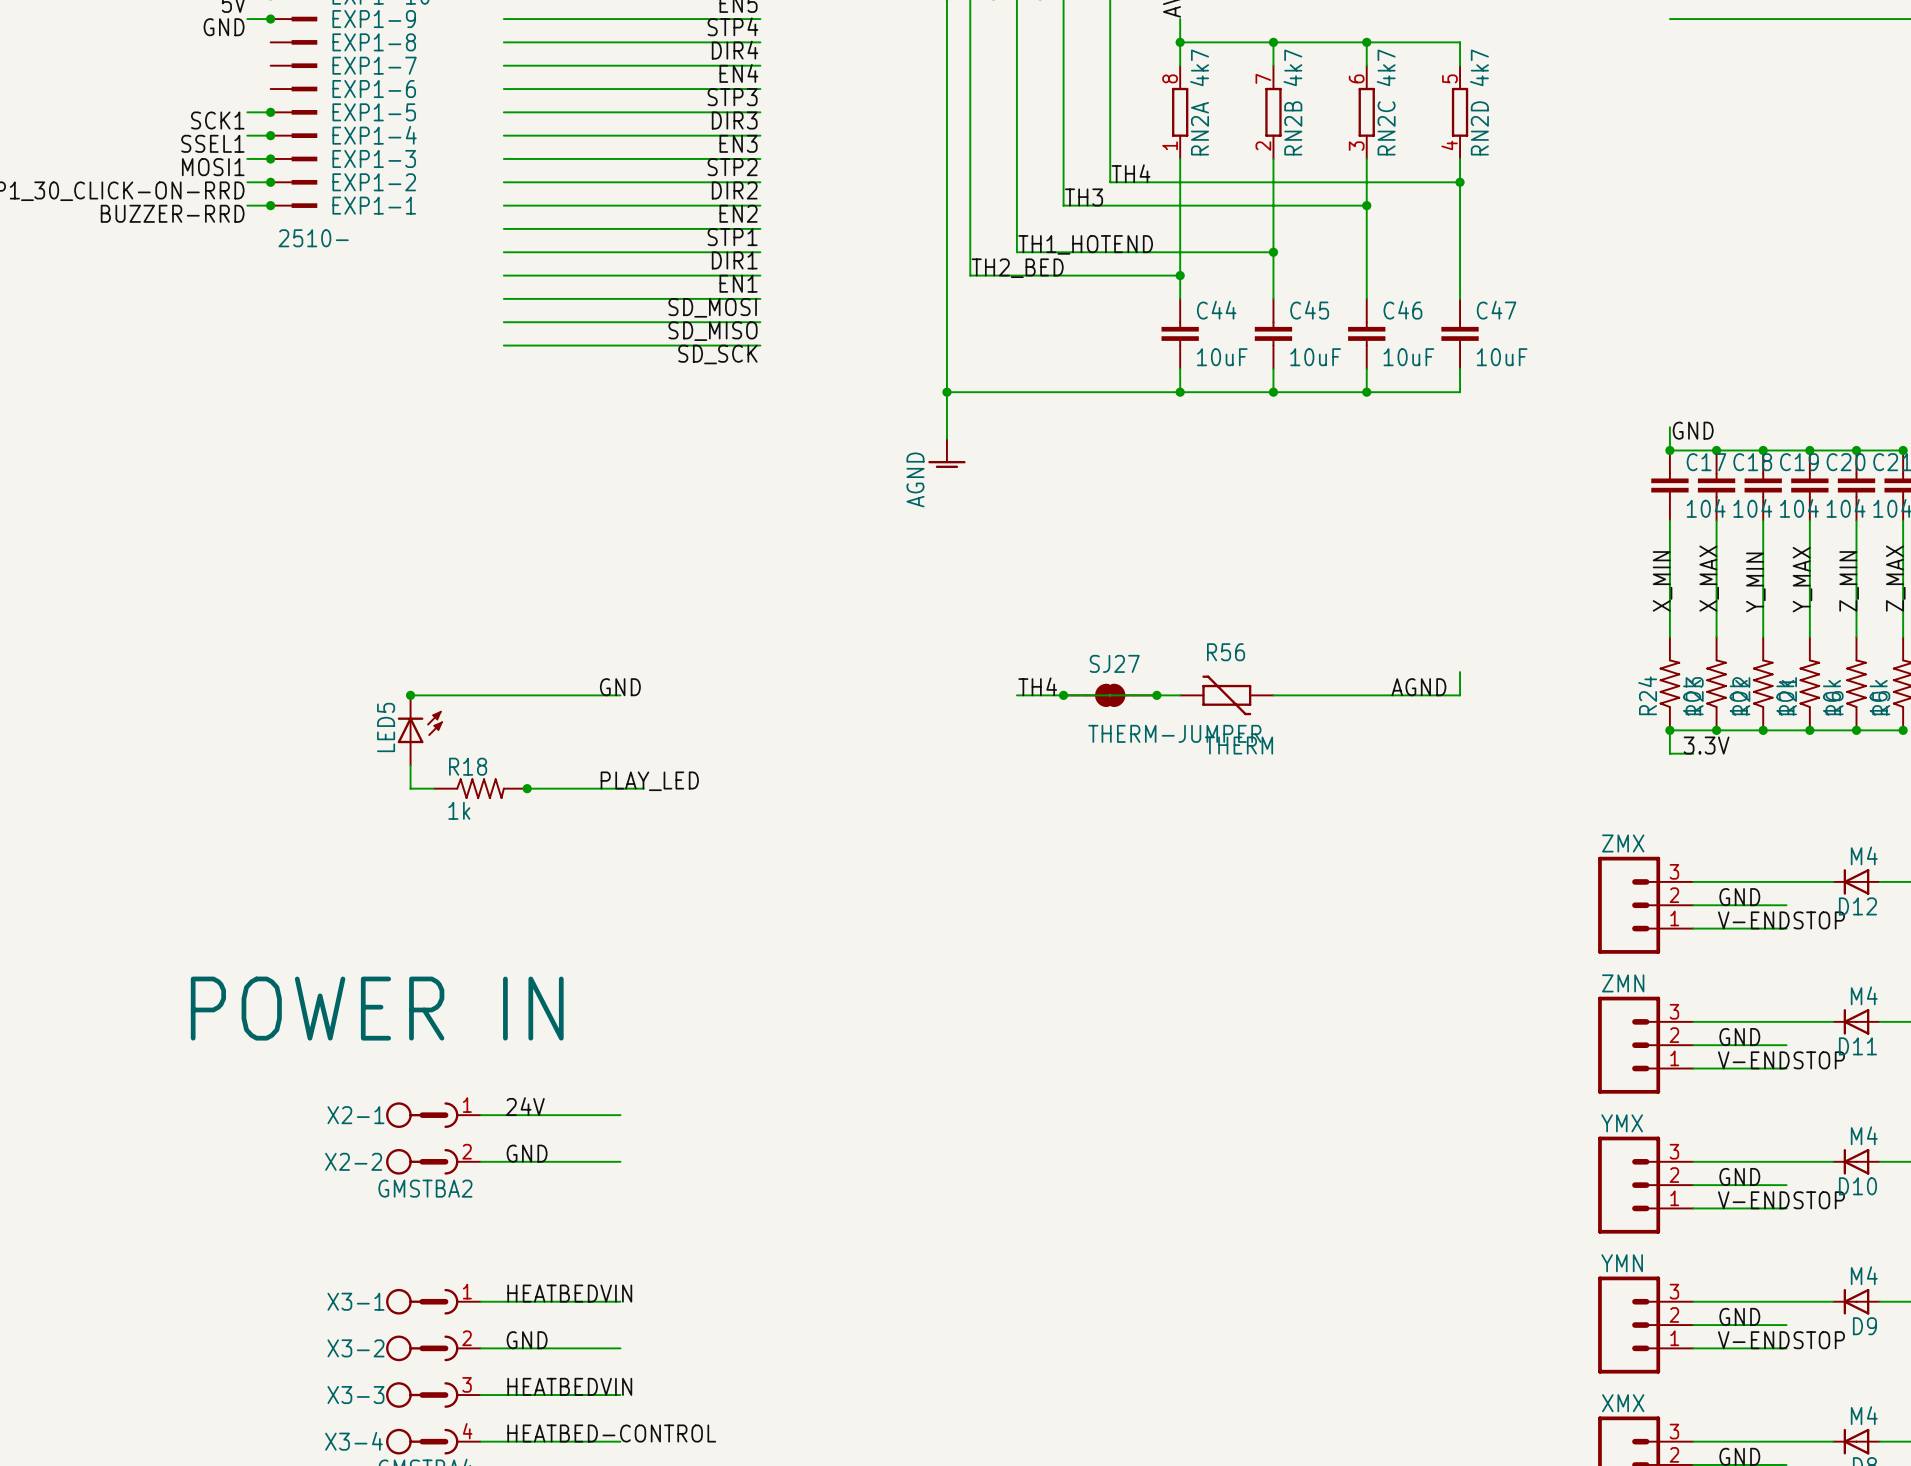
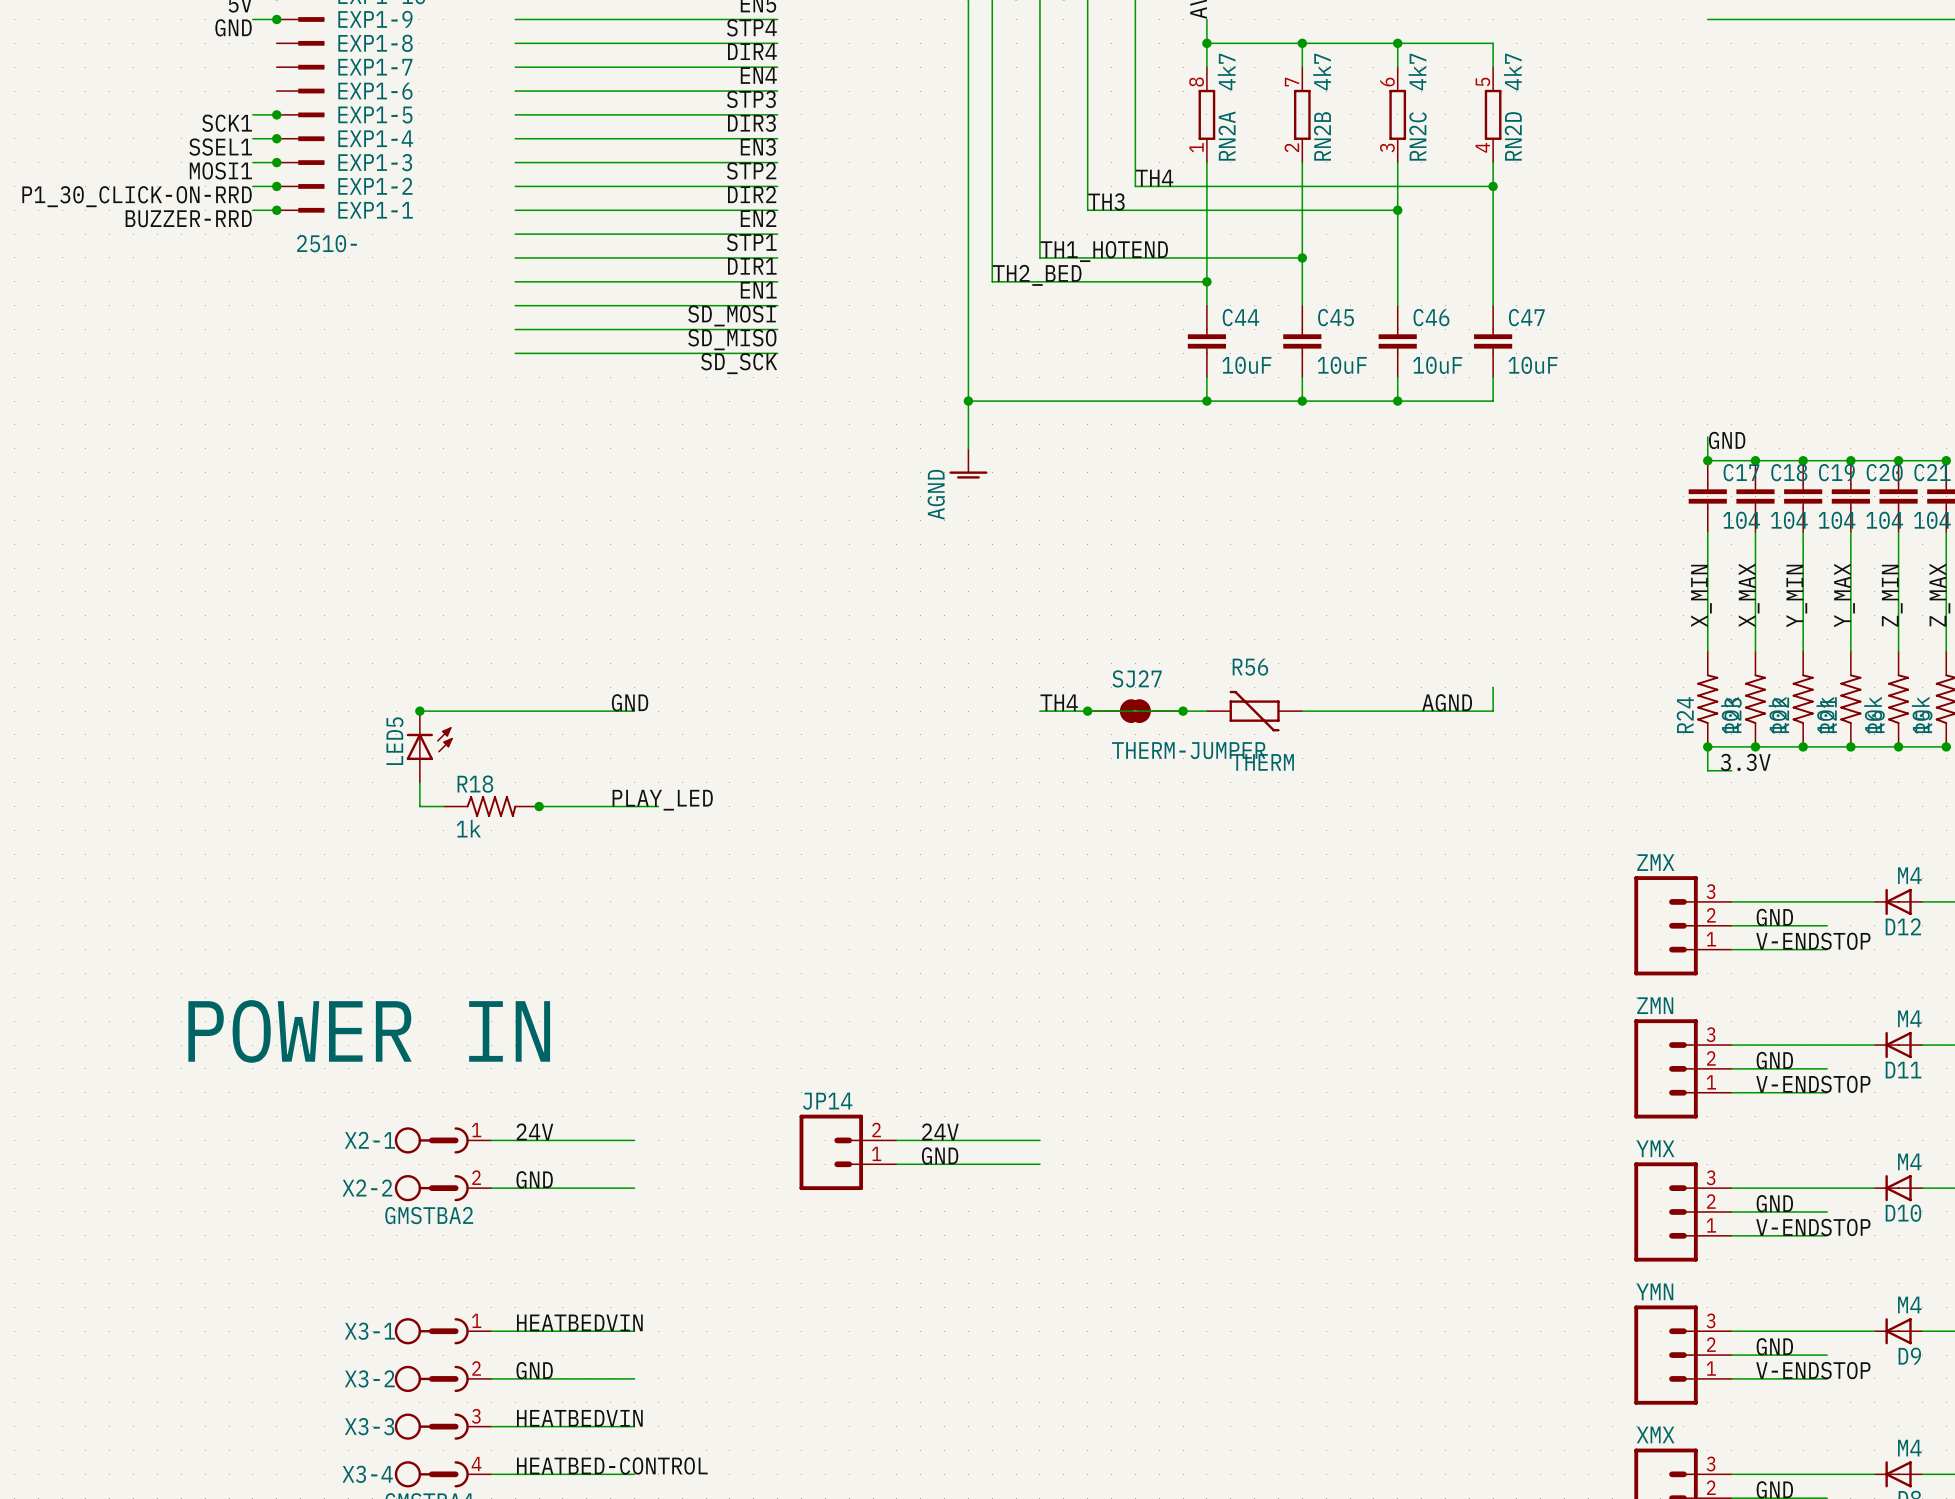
label: none -> 24V (940, 1131)
wire: none -> (896, 1140) (1039, 1140)
JP14: none -> (848, 1152)
label: none -> GND (940, 1155)
wire: none -> (896, 1164) (1039, 1164)

